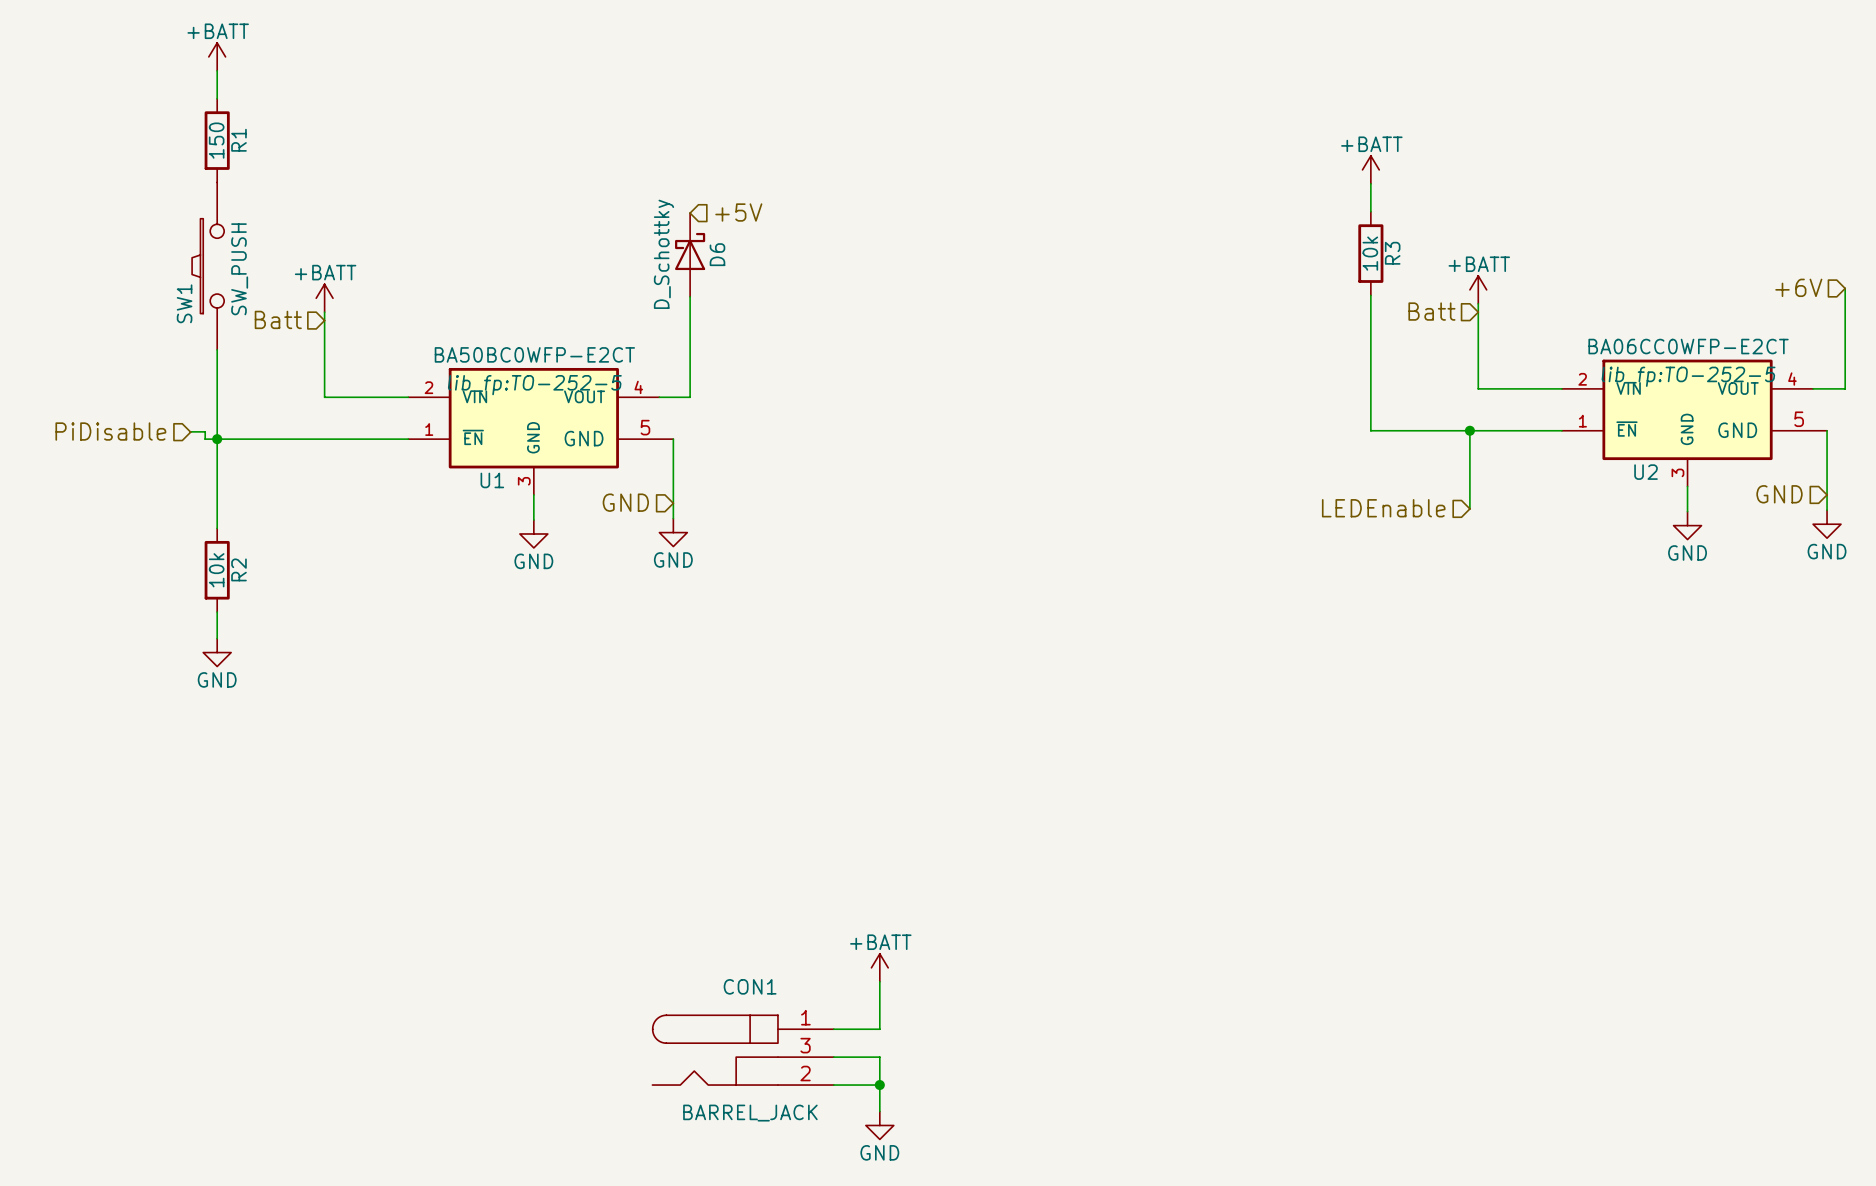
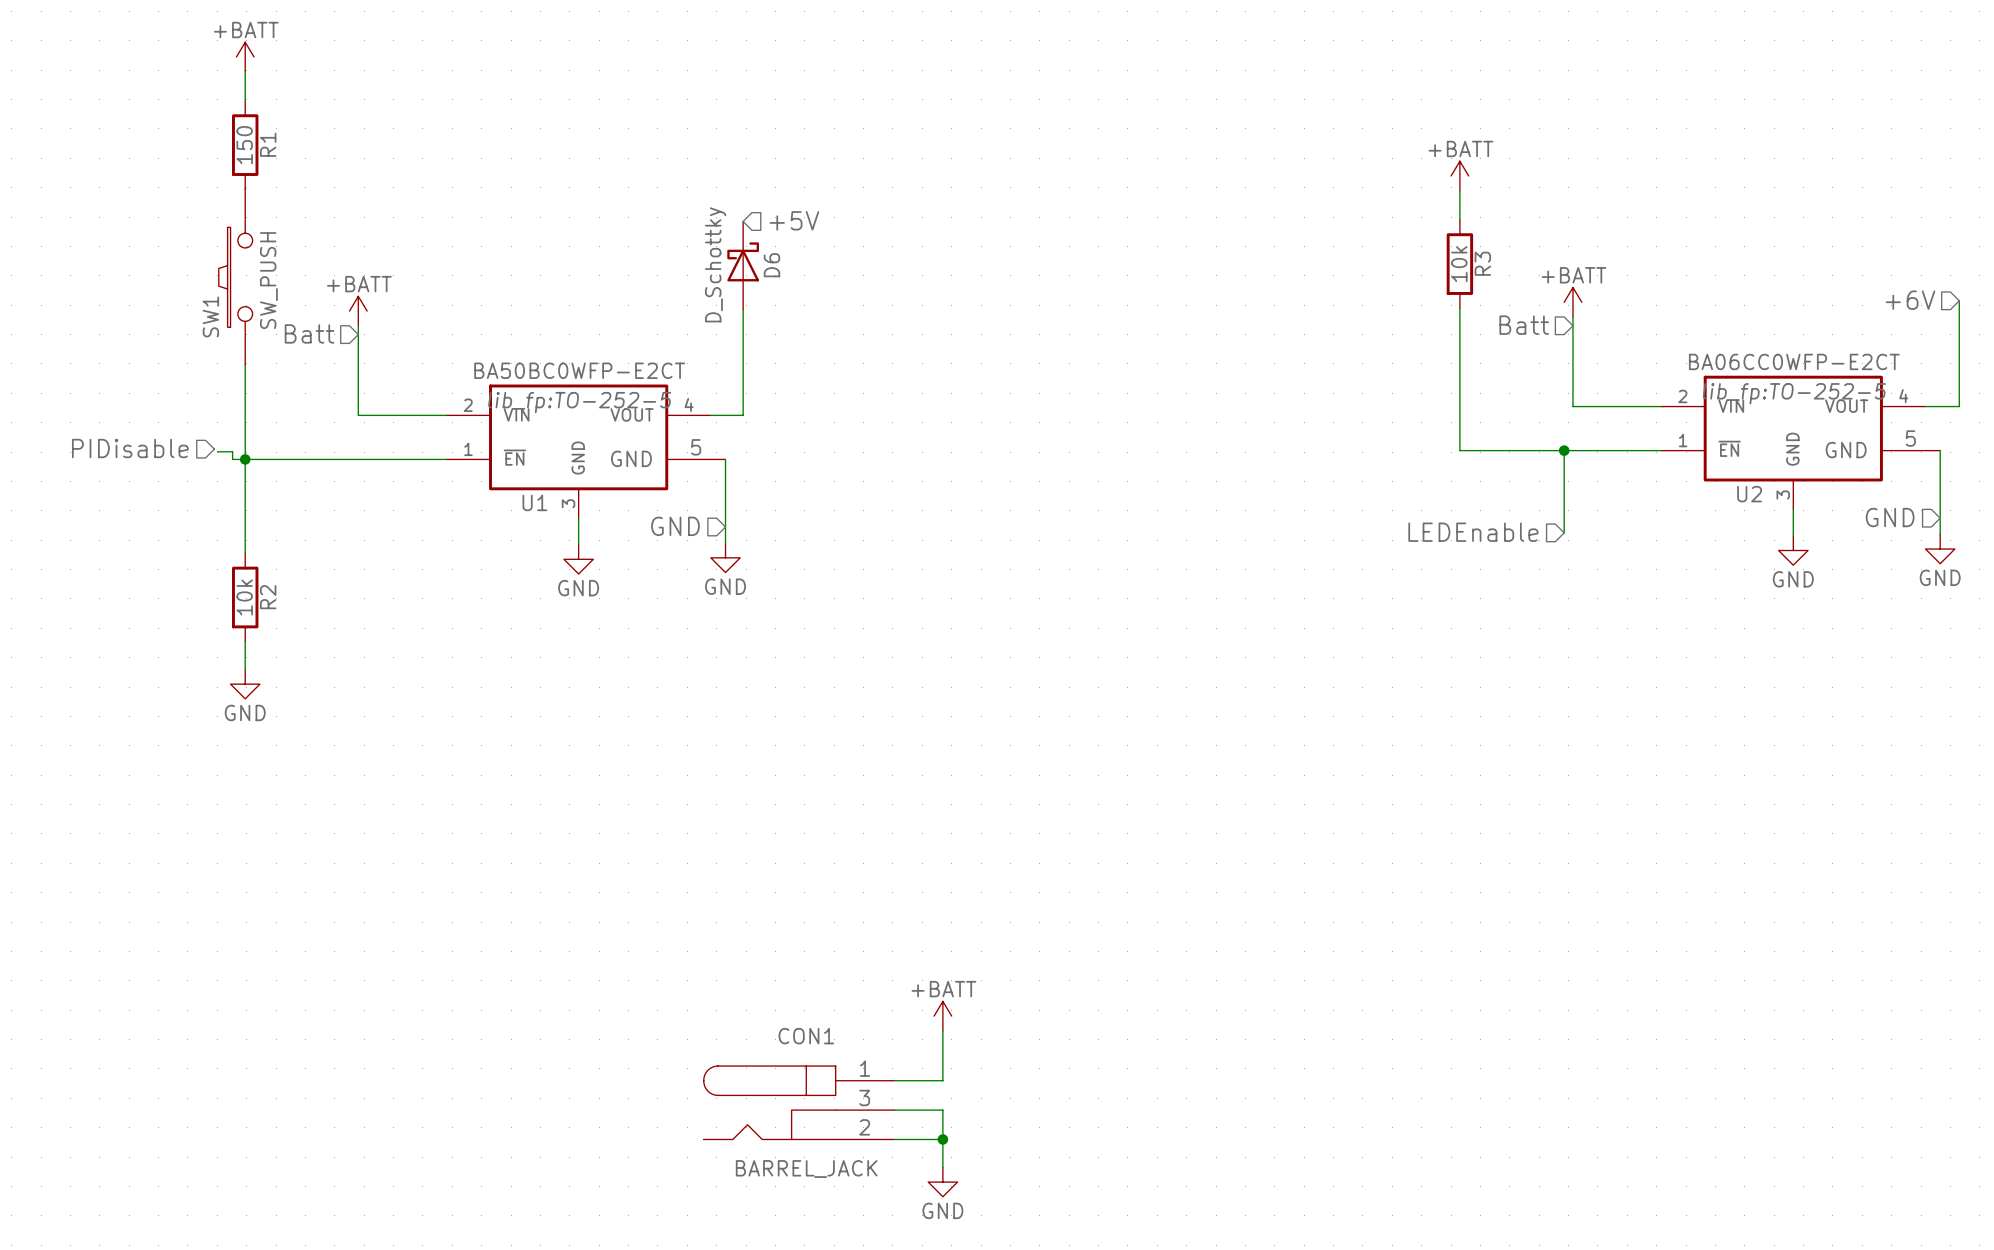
hierarchical label: PiDisable (110, 431) -> PIDisable (130, 448)

